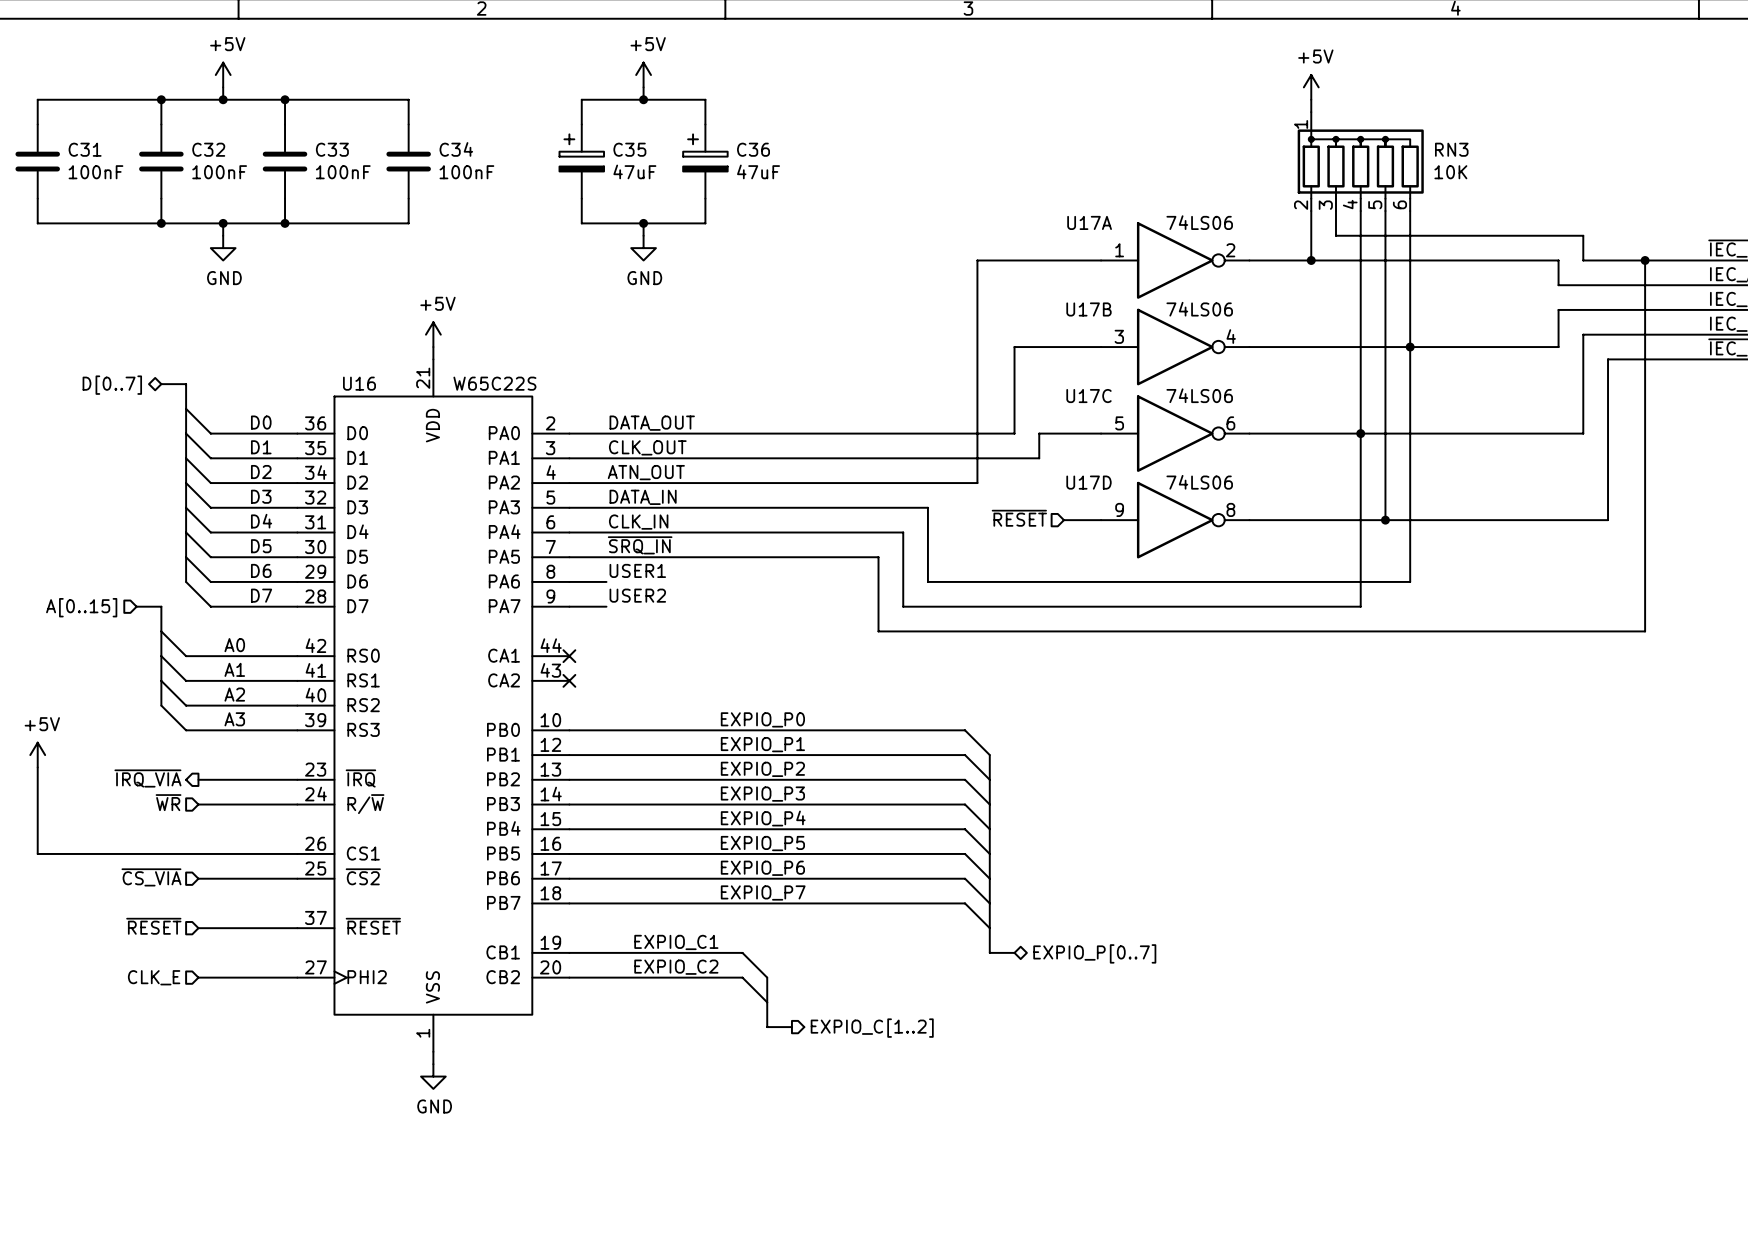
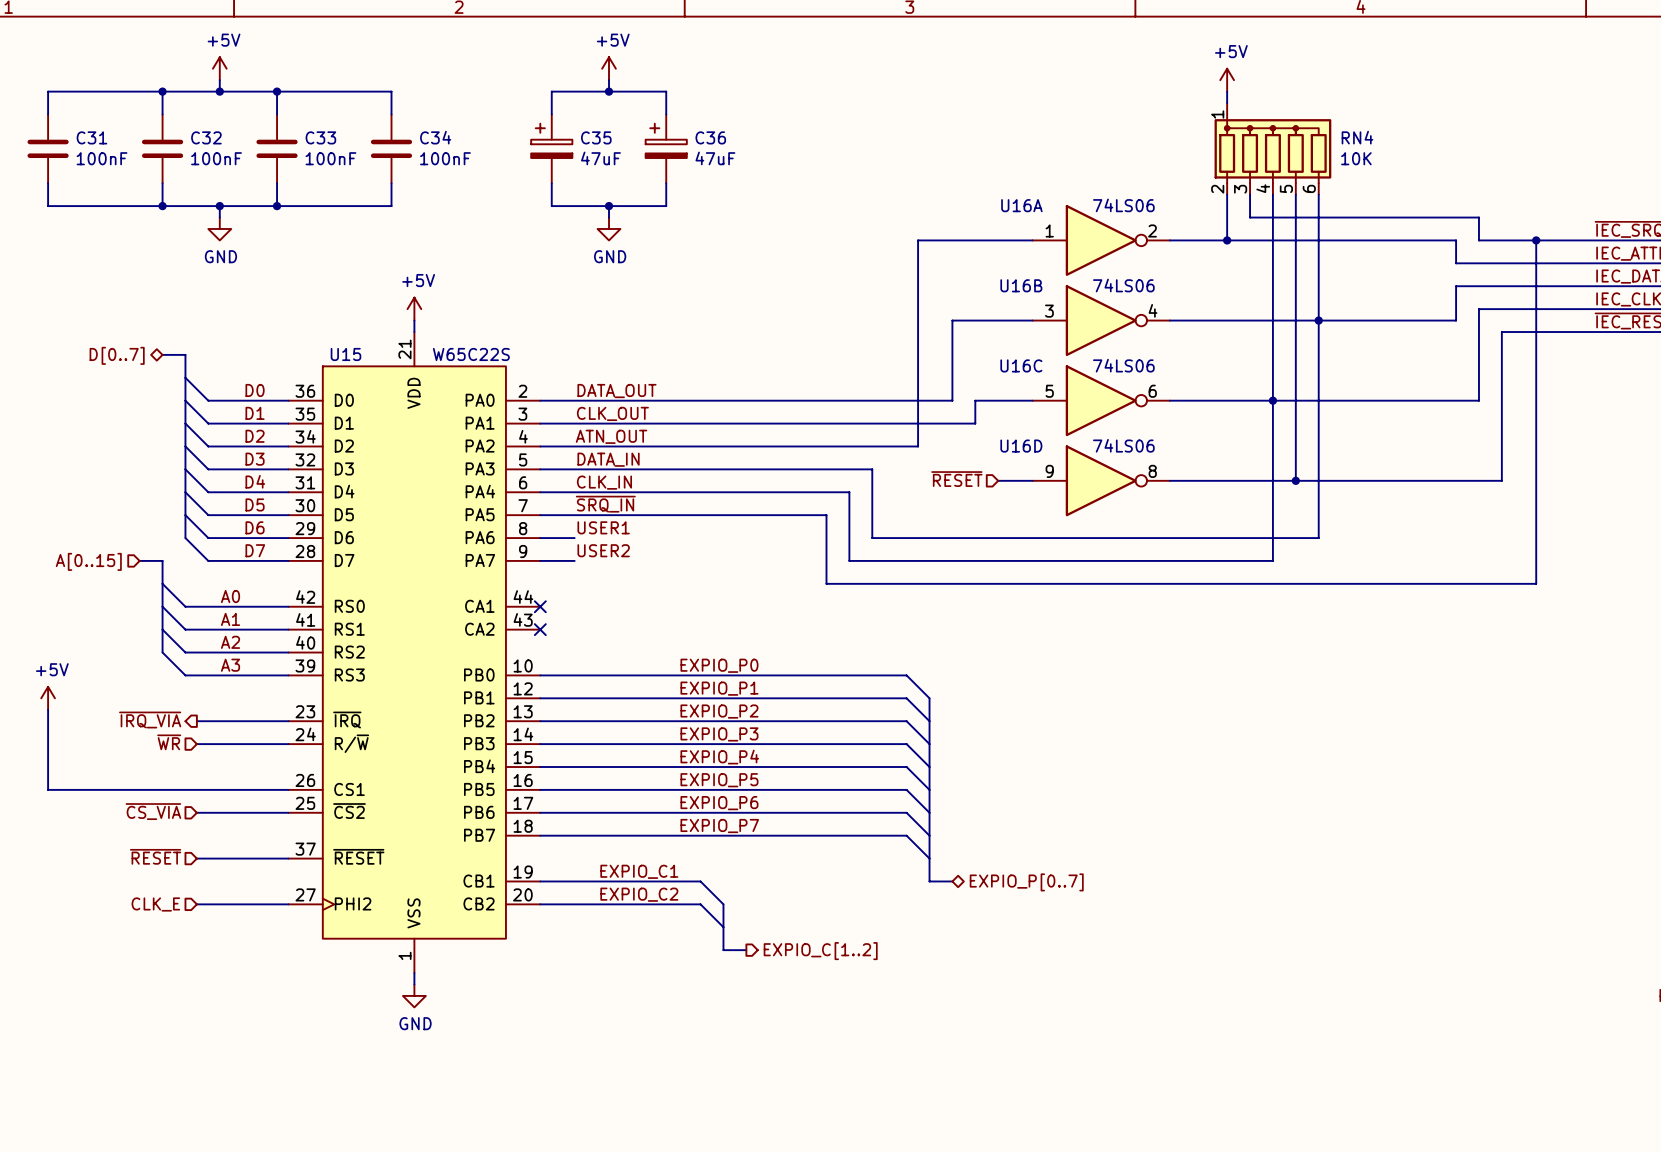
RN3 name: RN3 (1451, 149) -> RN4 (1357, 137)
U17A name: U17A (1089, 222) -> U16A (1021, 205)
U17B name: U17B (1089, 309) -> U16B (1021, 285)
U16 name: U16 (359, 383) -> U15 (345, 354)
U17C name: U17C (1089, 396) -> U16C (1021, 365)
U17D name: U17D (1089, 482) -> U16D (1021, 446)

